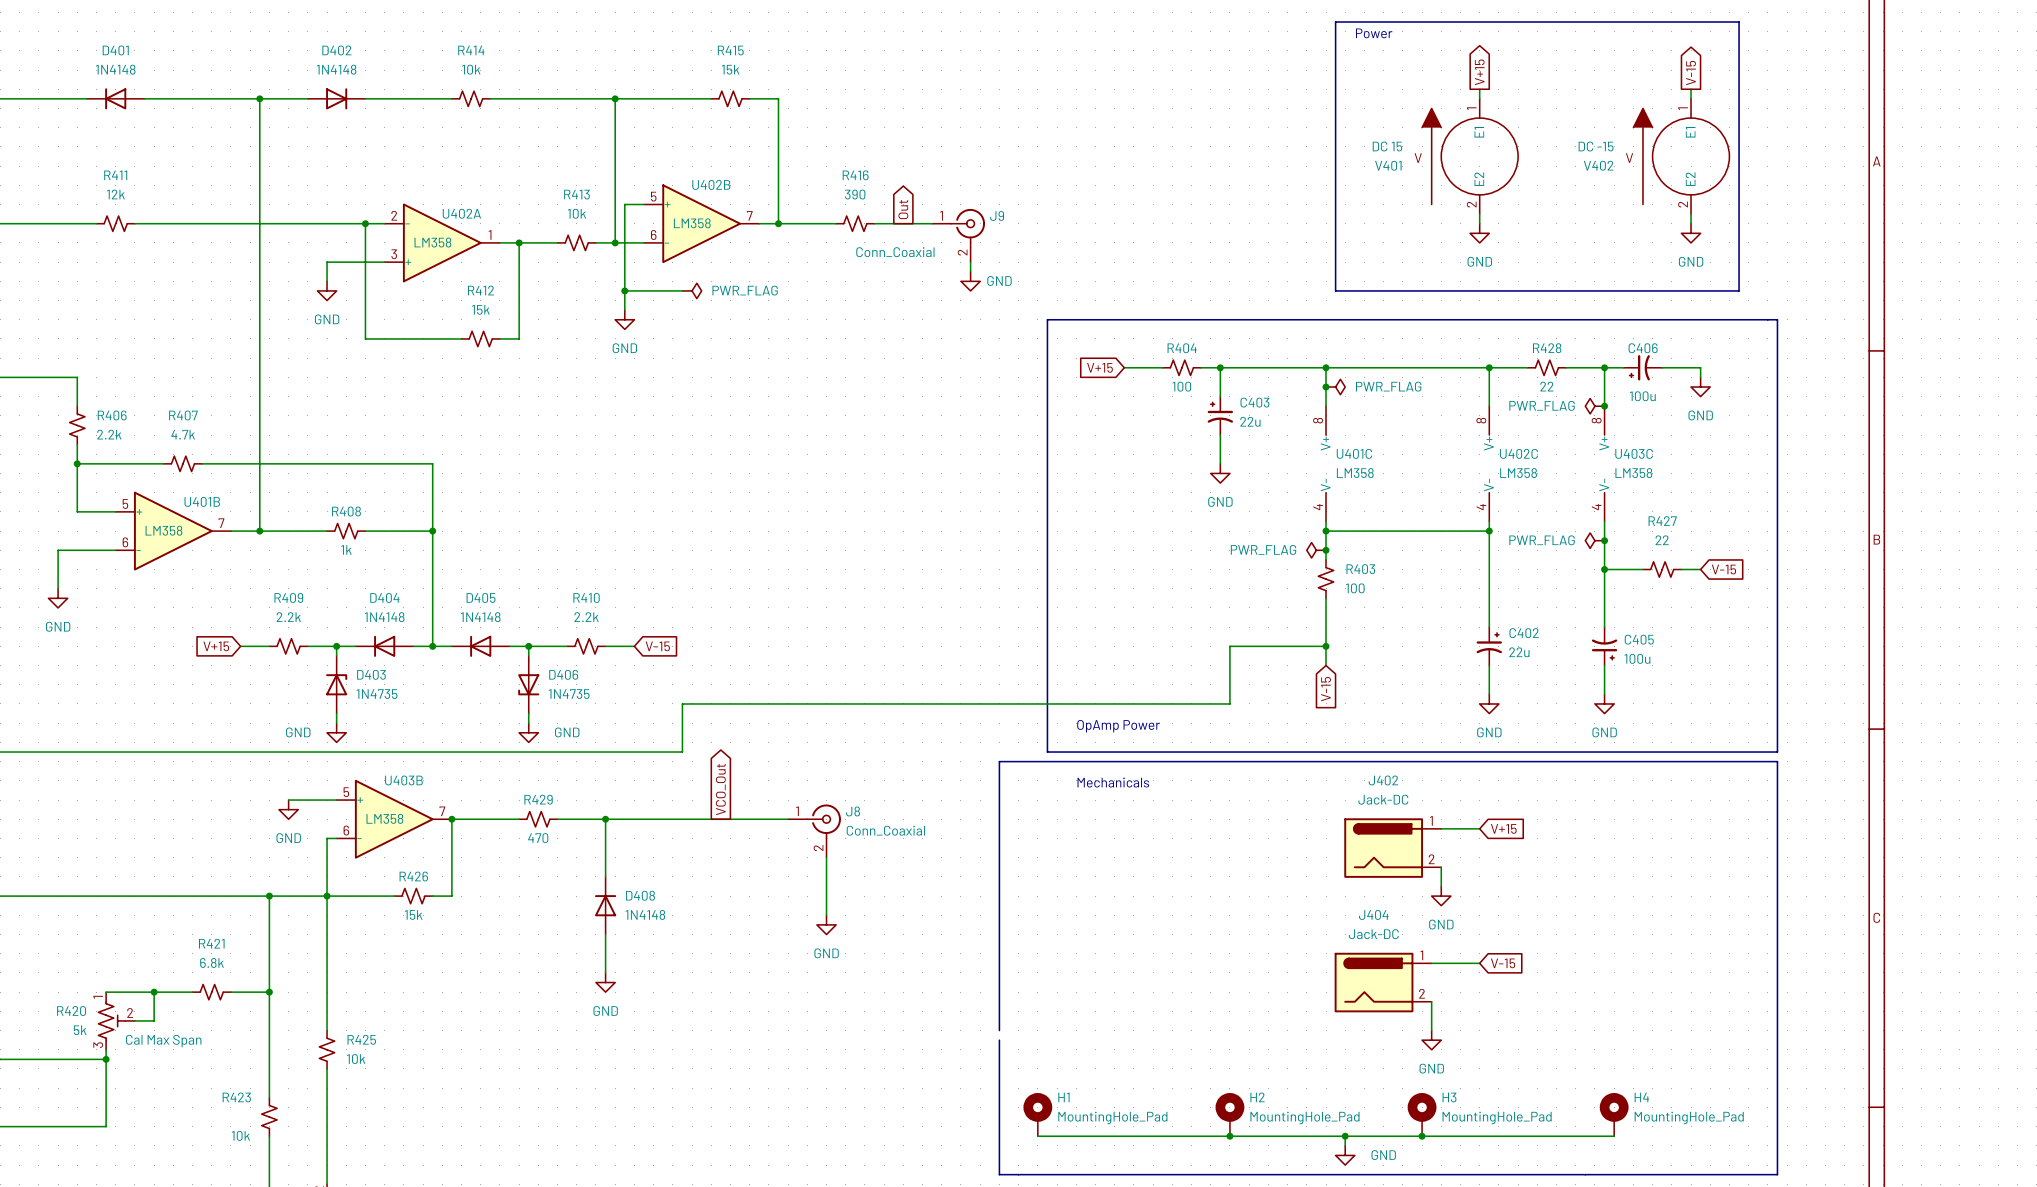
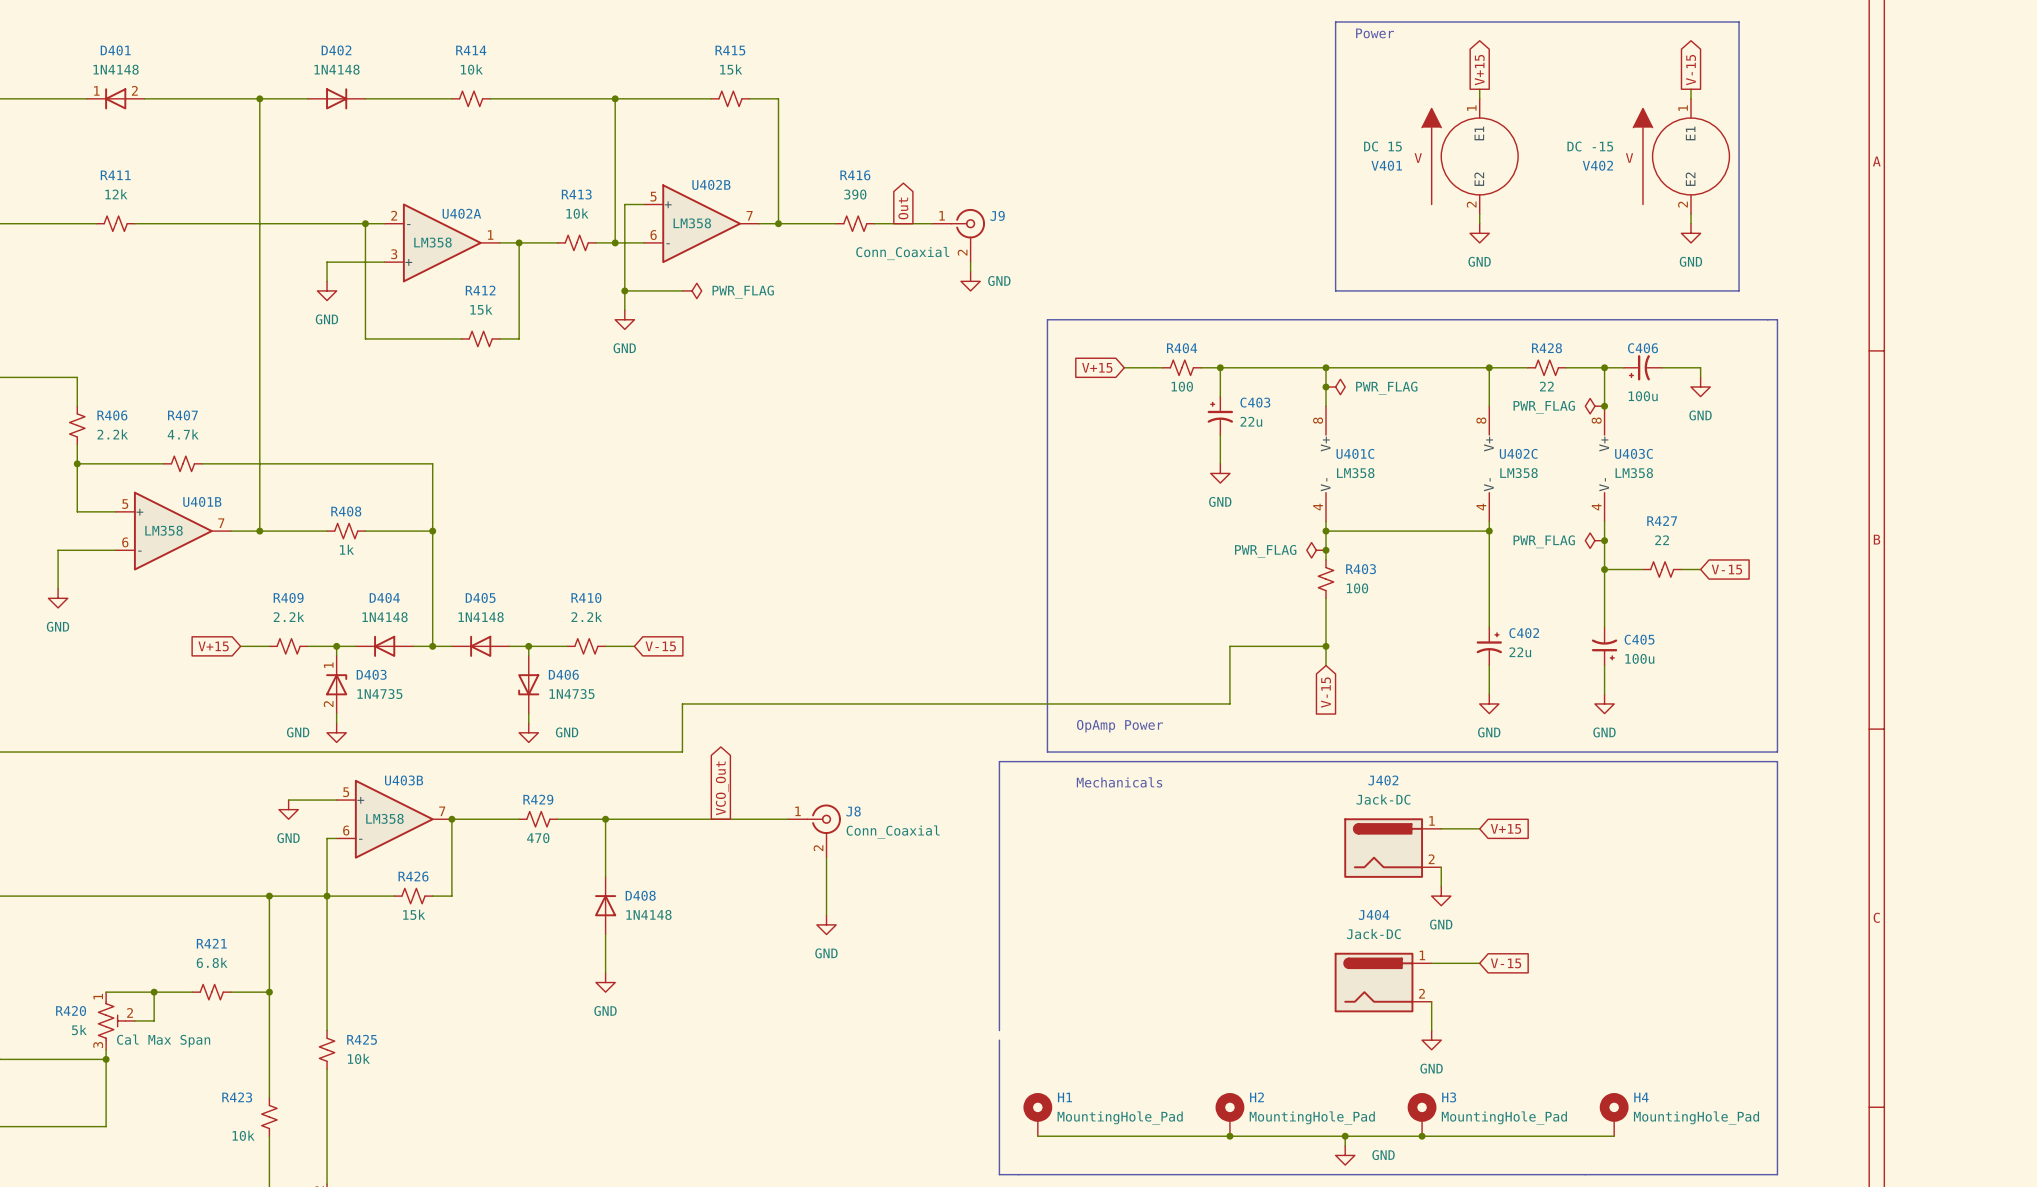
D401 pin number: none -> 1 (96, 90)
D401 pin number: none -> 2 (134, 90)
D403 pin number: none -> 1 (328, 665)
D403 pin number: none -> 2 (328, 704)

